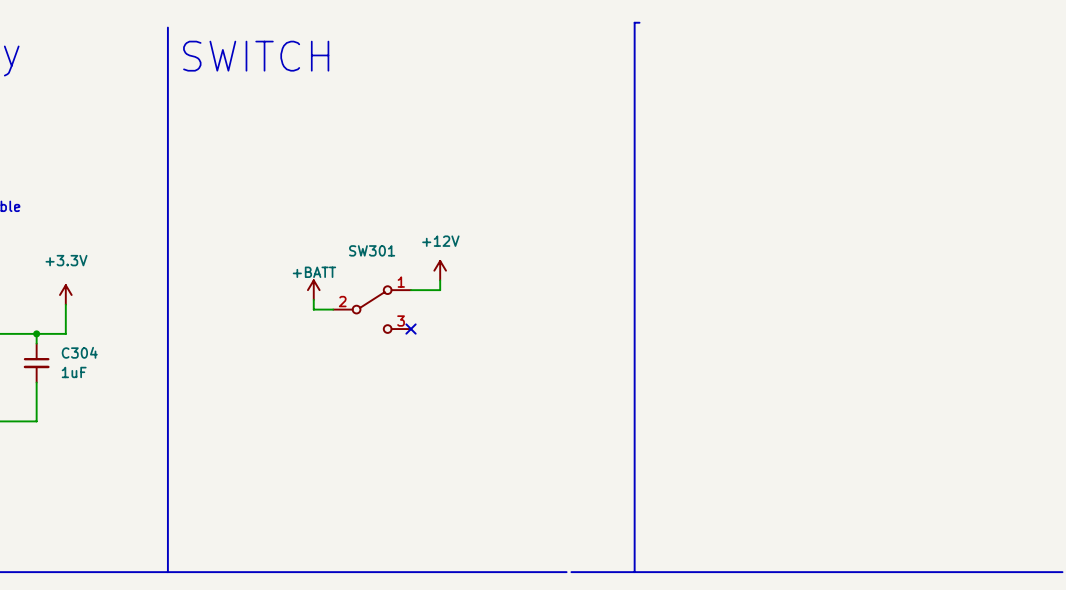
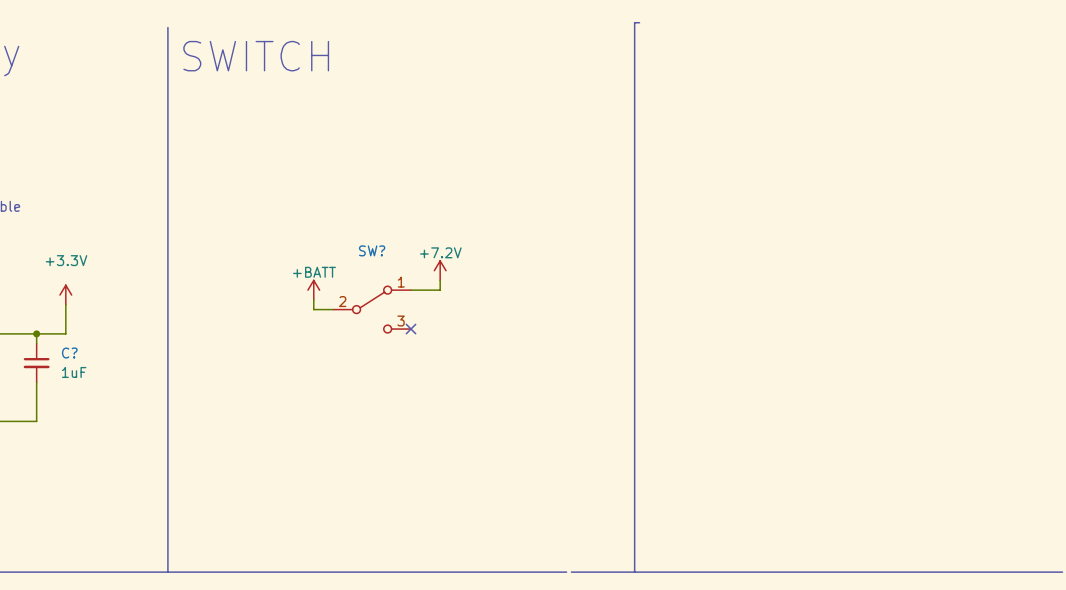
SW301 name: SW301 (372, 250) -> SW? (372, 250)
power symbol: +12V (440, 270) -> +7.2V (440, 270)
C304 name: C304 (79, 352) -> C? (69, 353)

